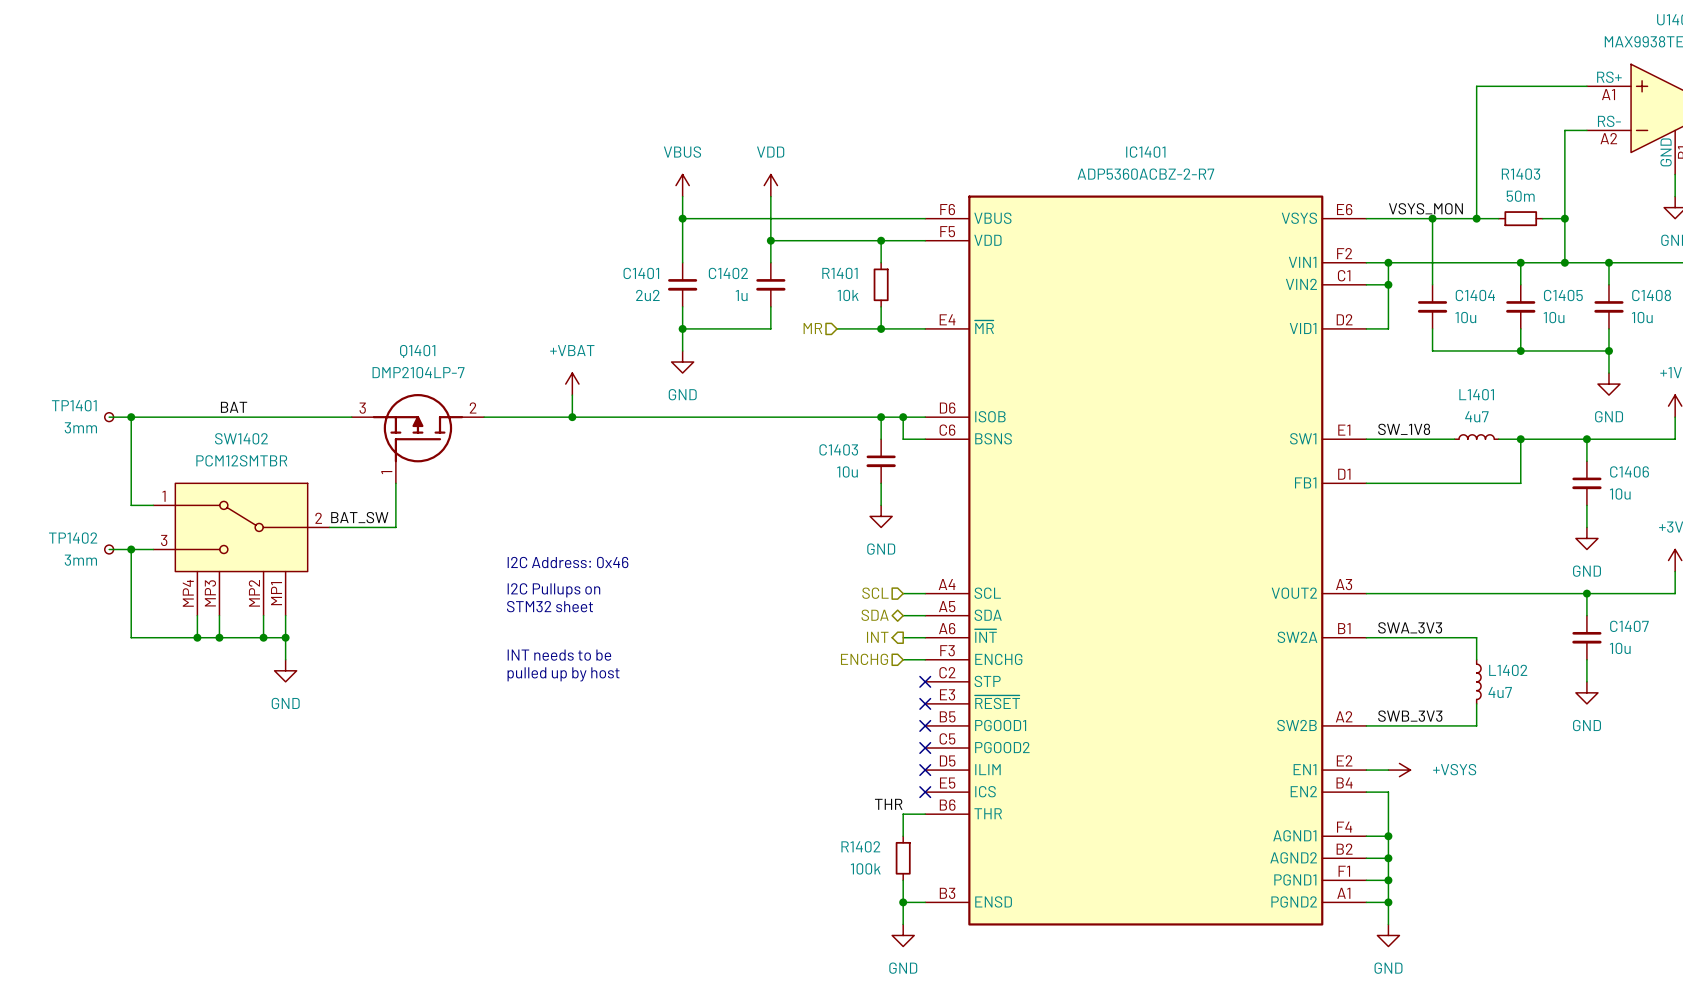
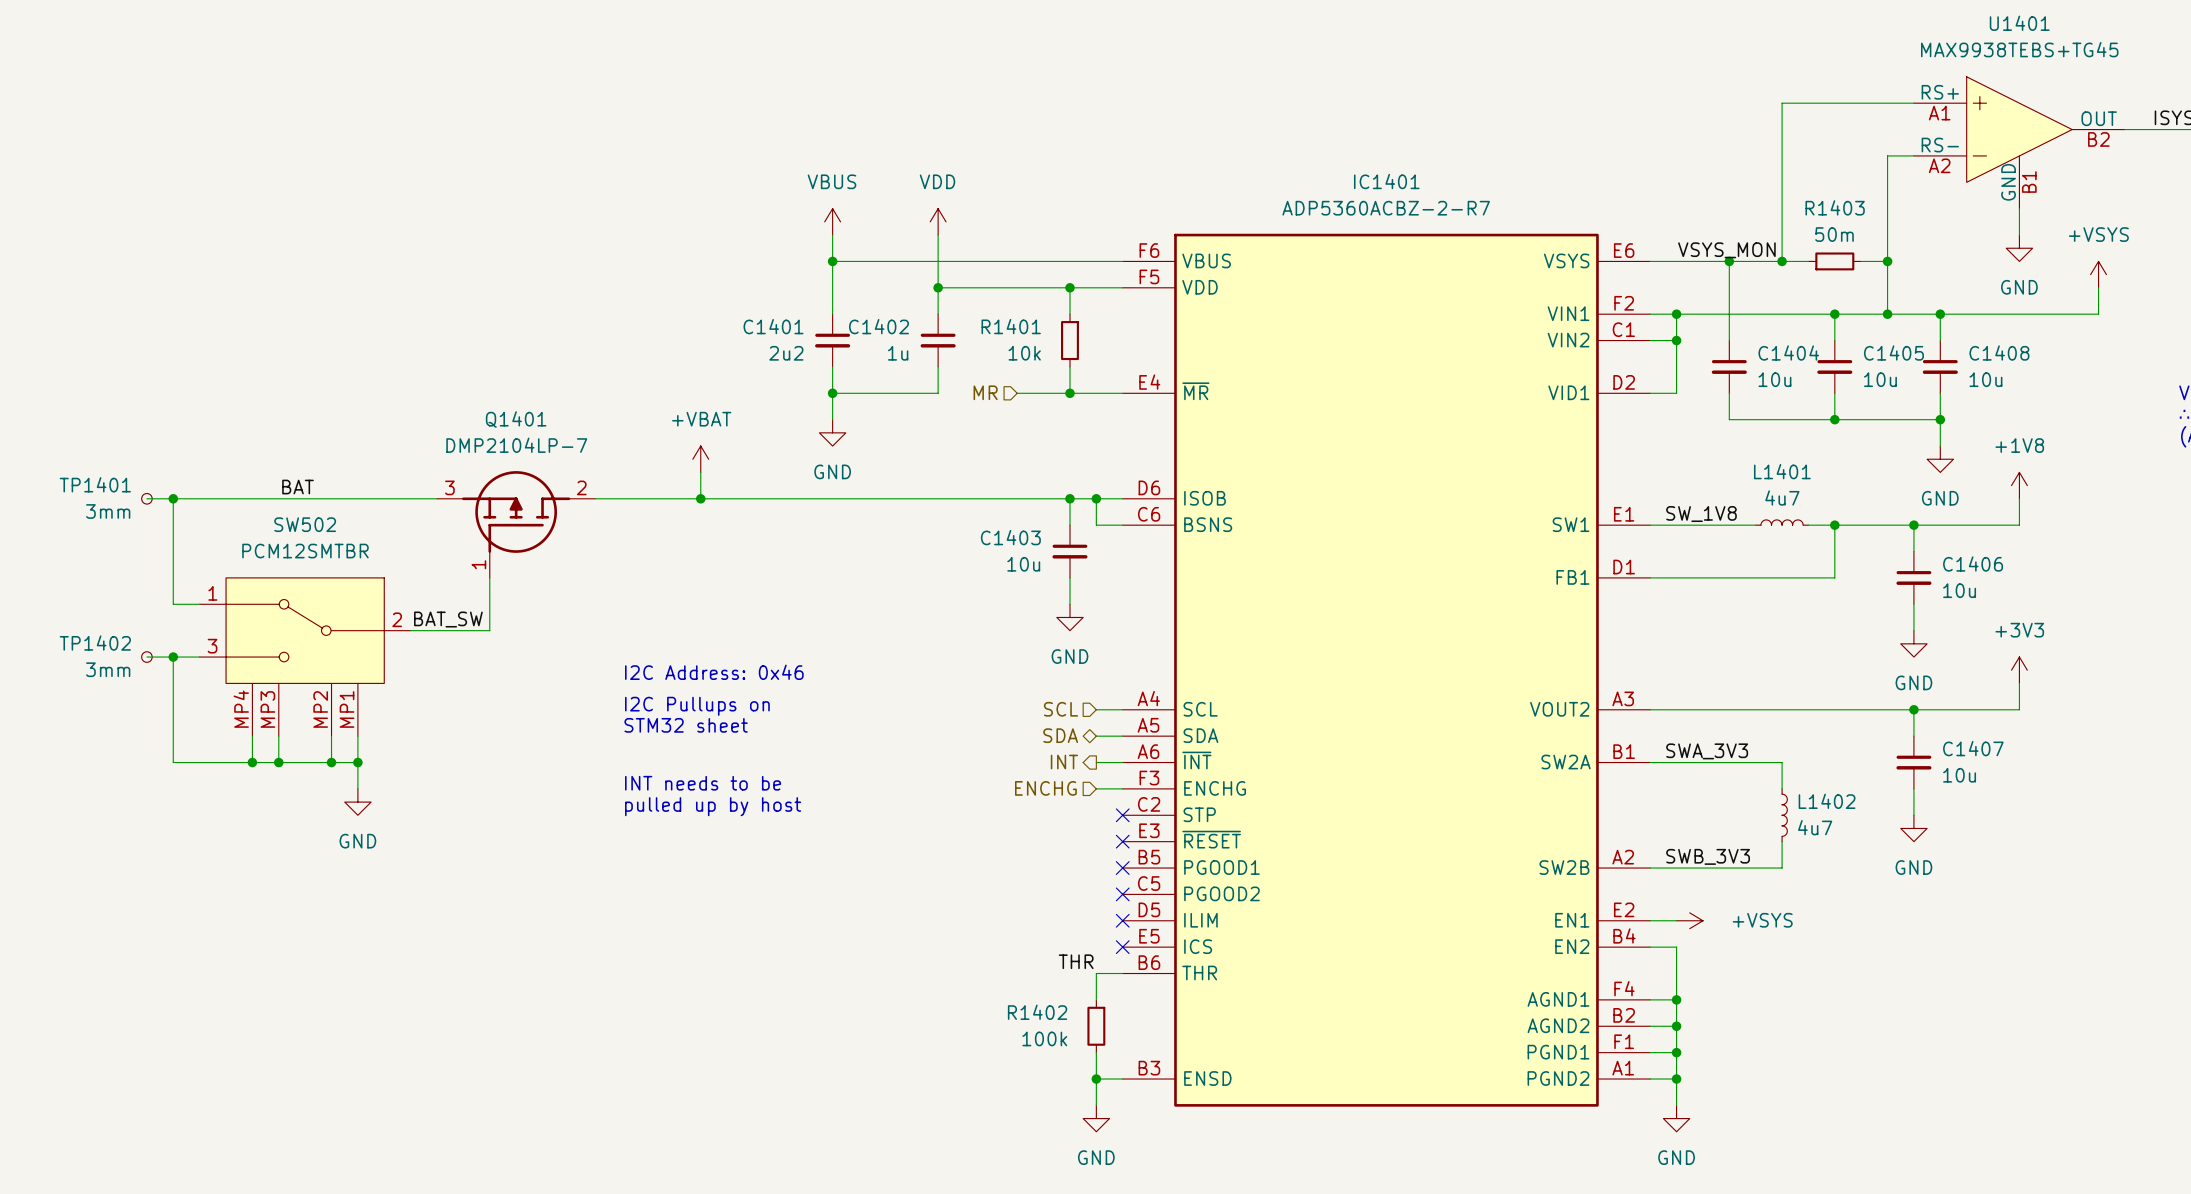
SW1402 name: SW1402 (241, 438) -> SW502 (305, 524)

